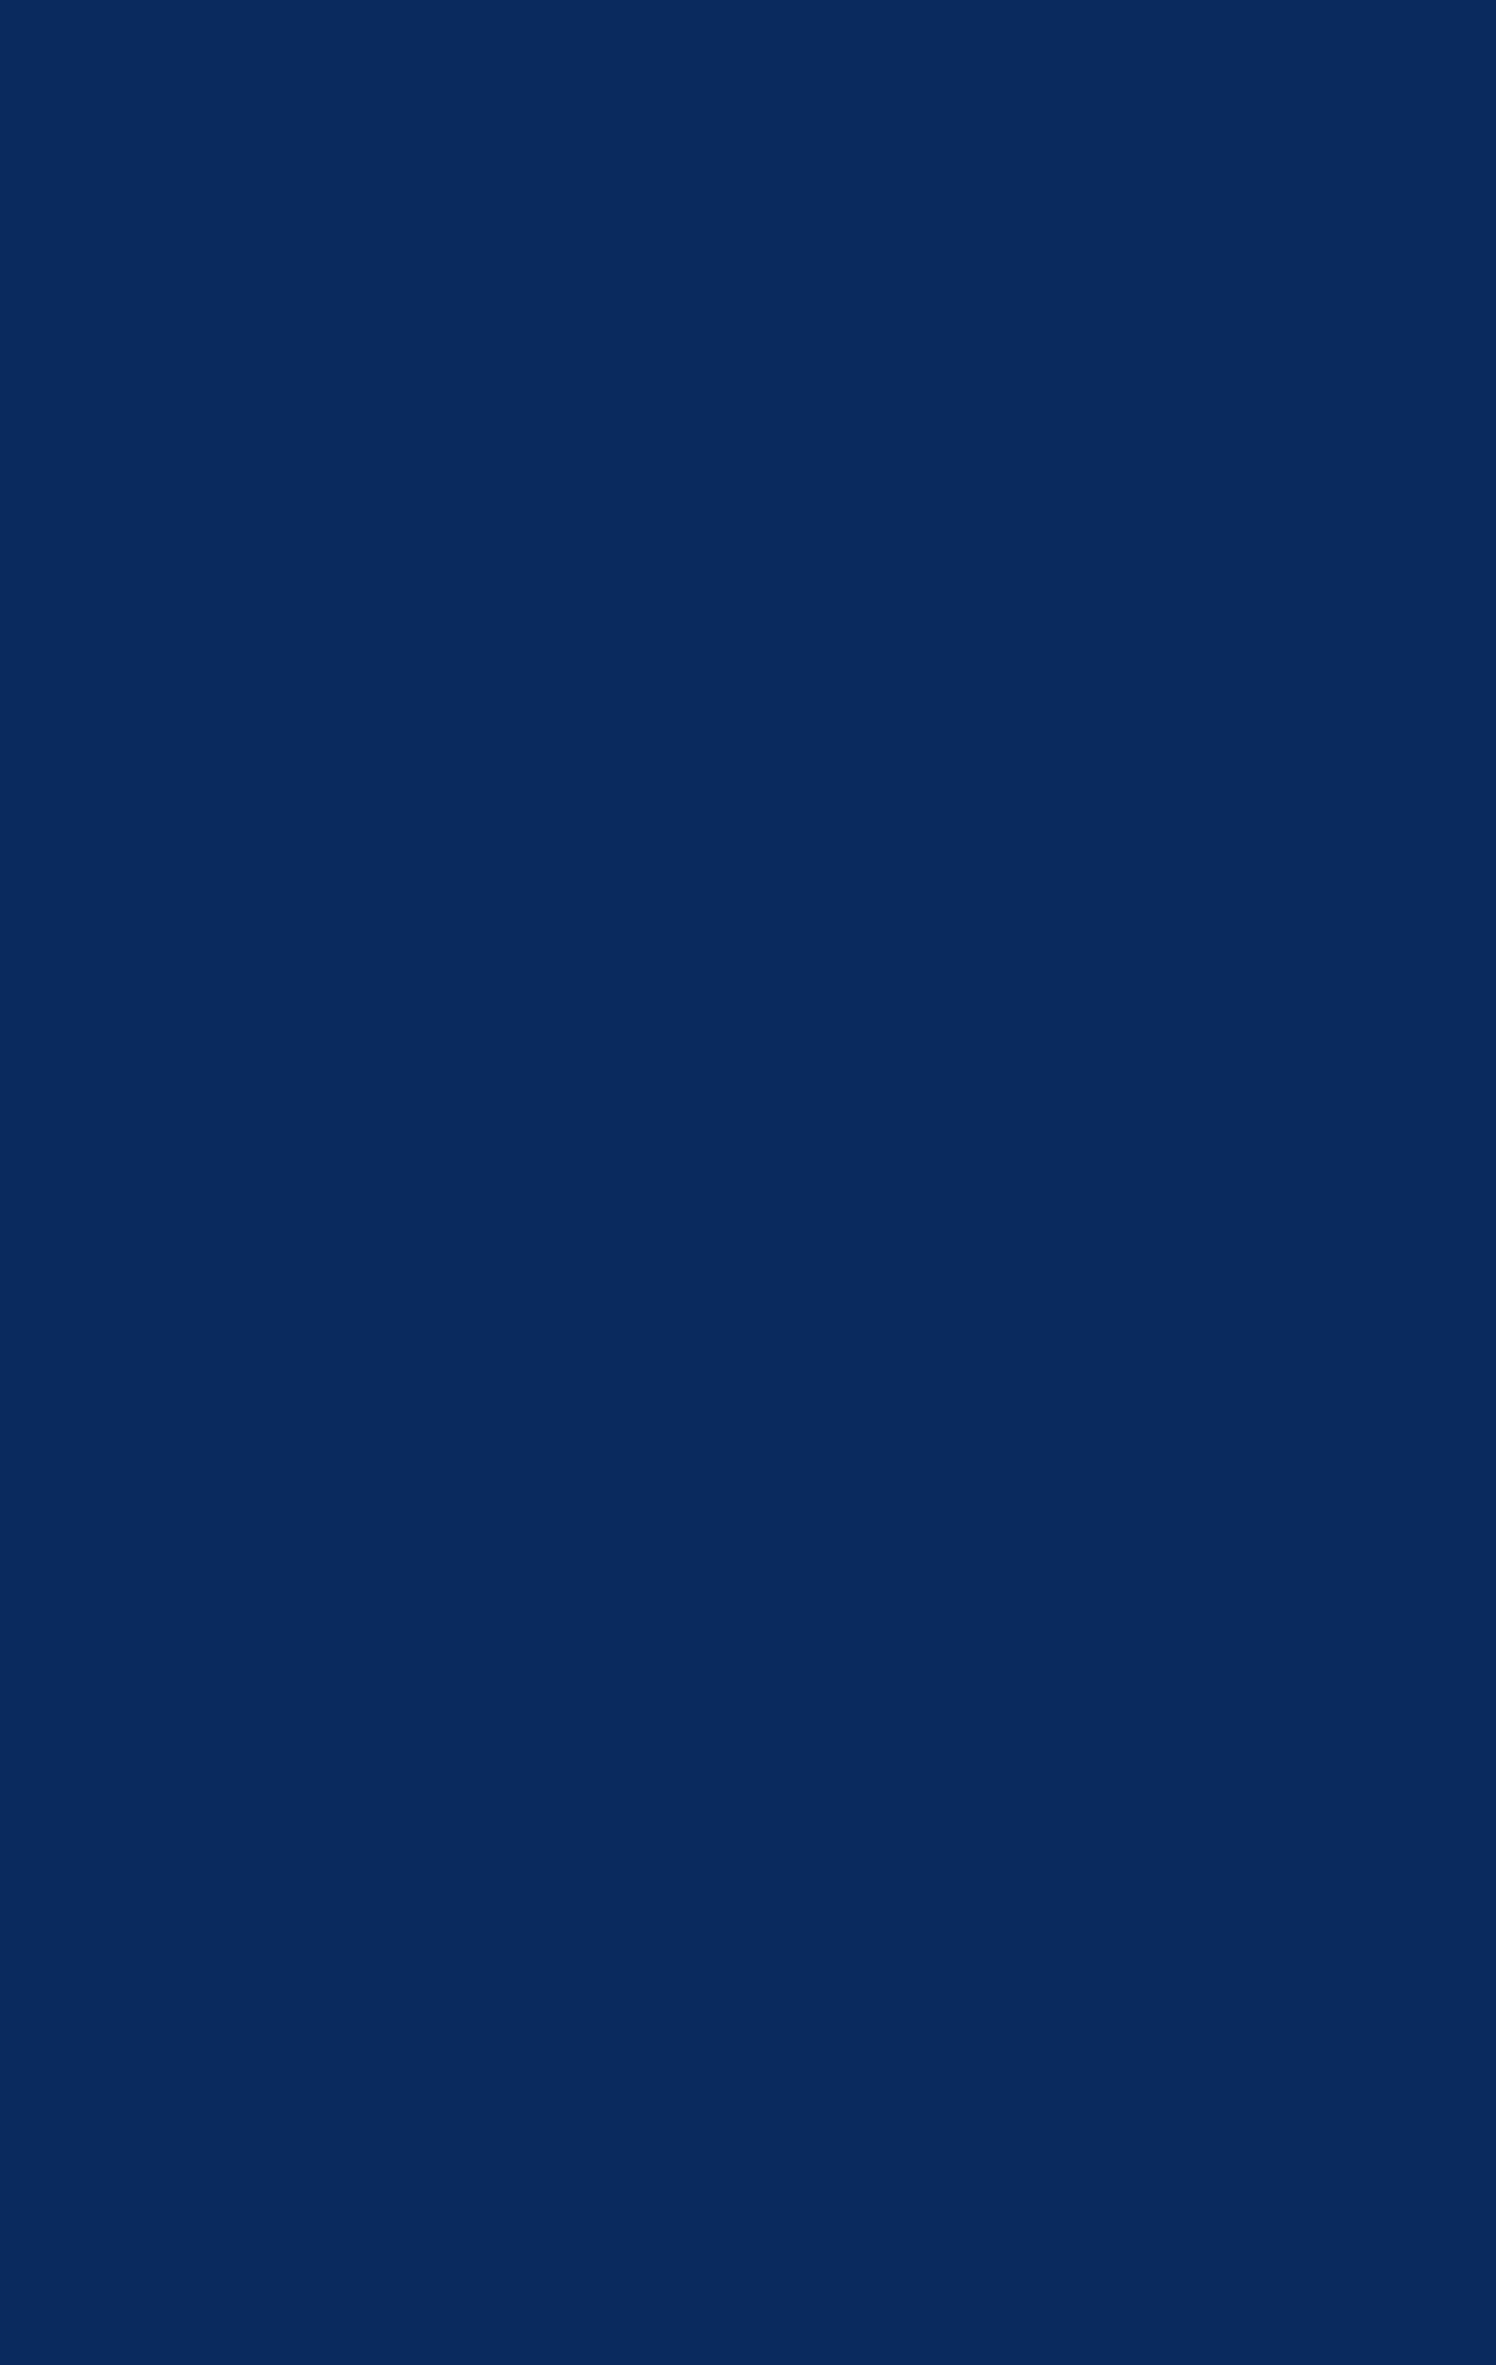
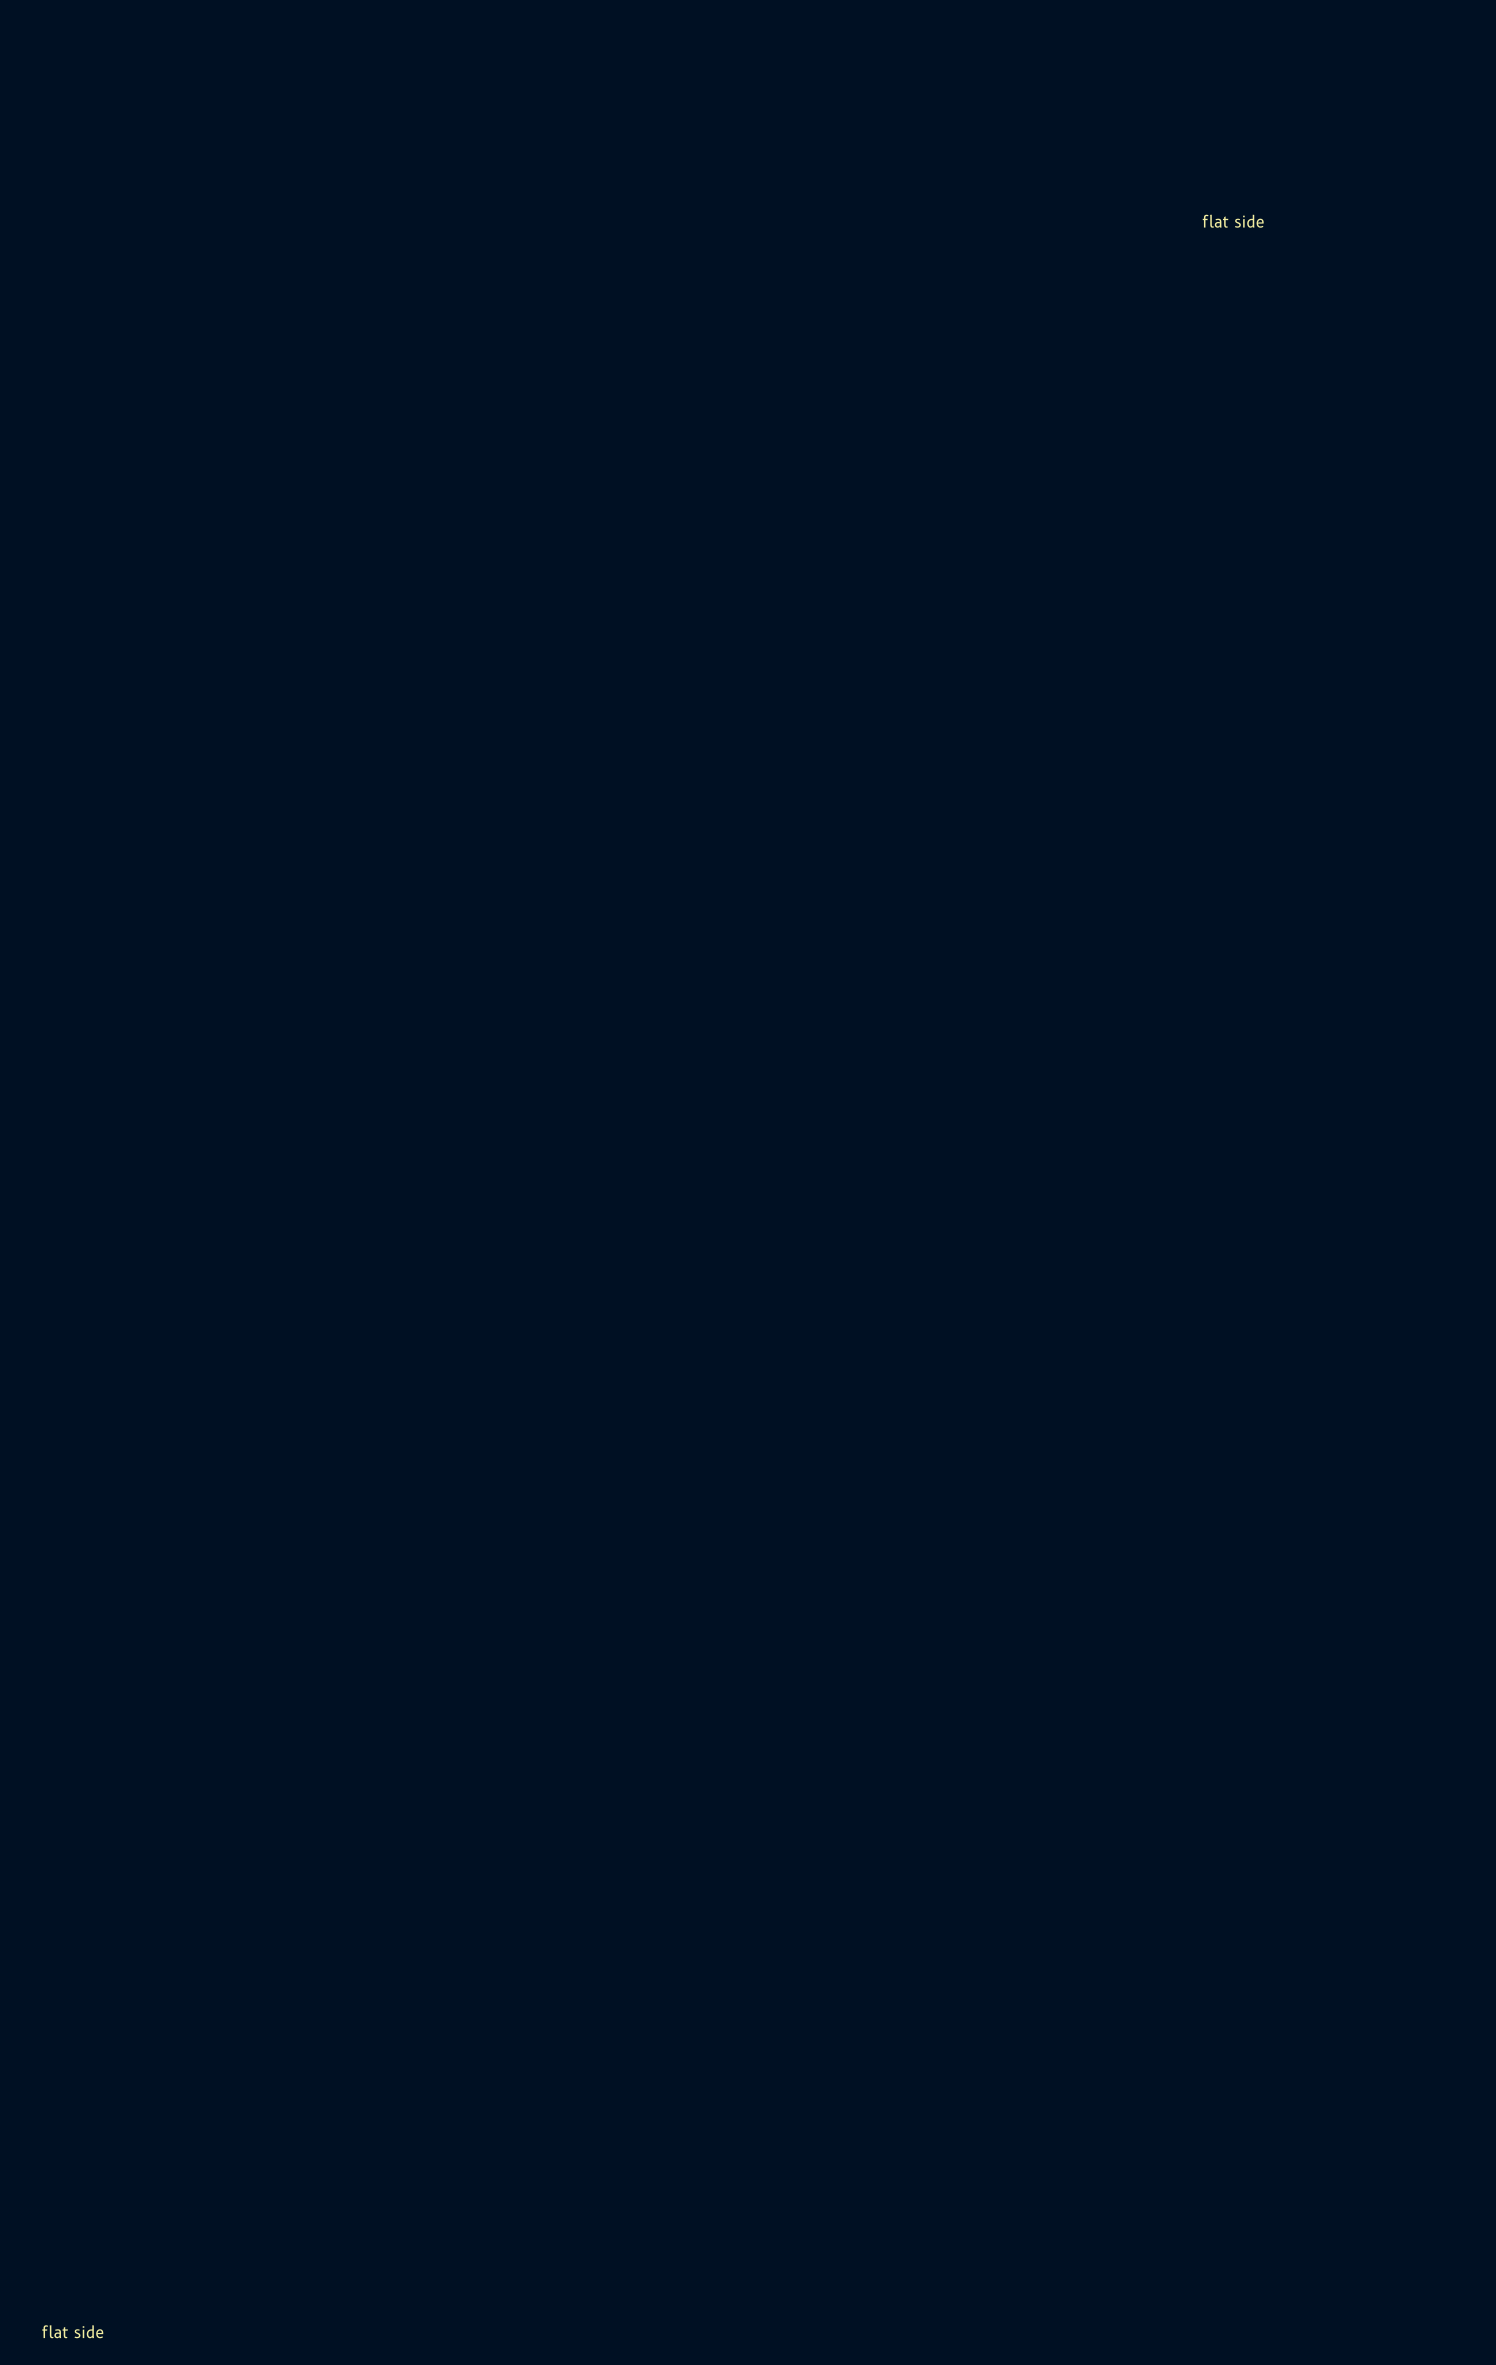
flat side name: none -> flat side (1233, 221)
flat side name: none -> flat side (72, 2331)

